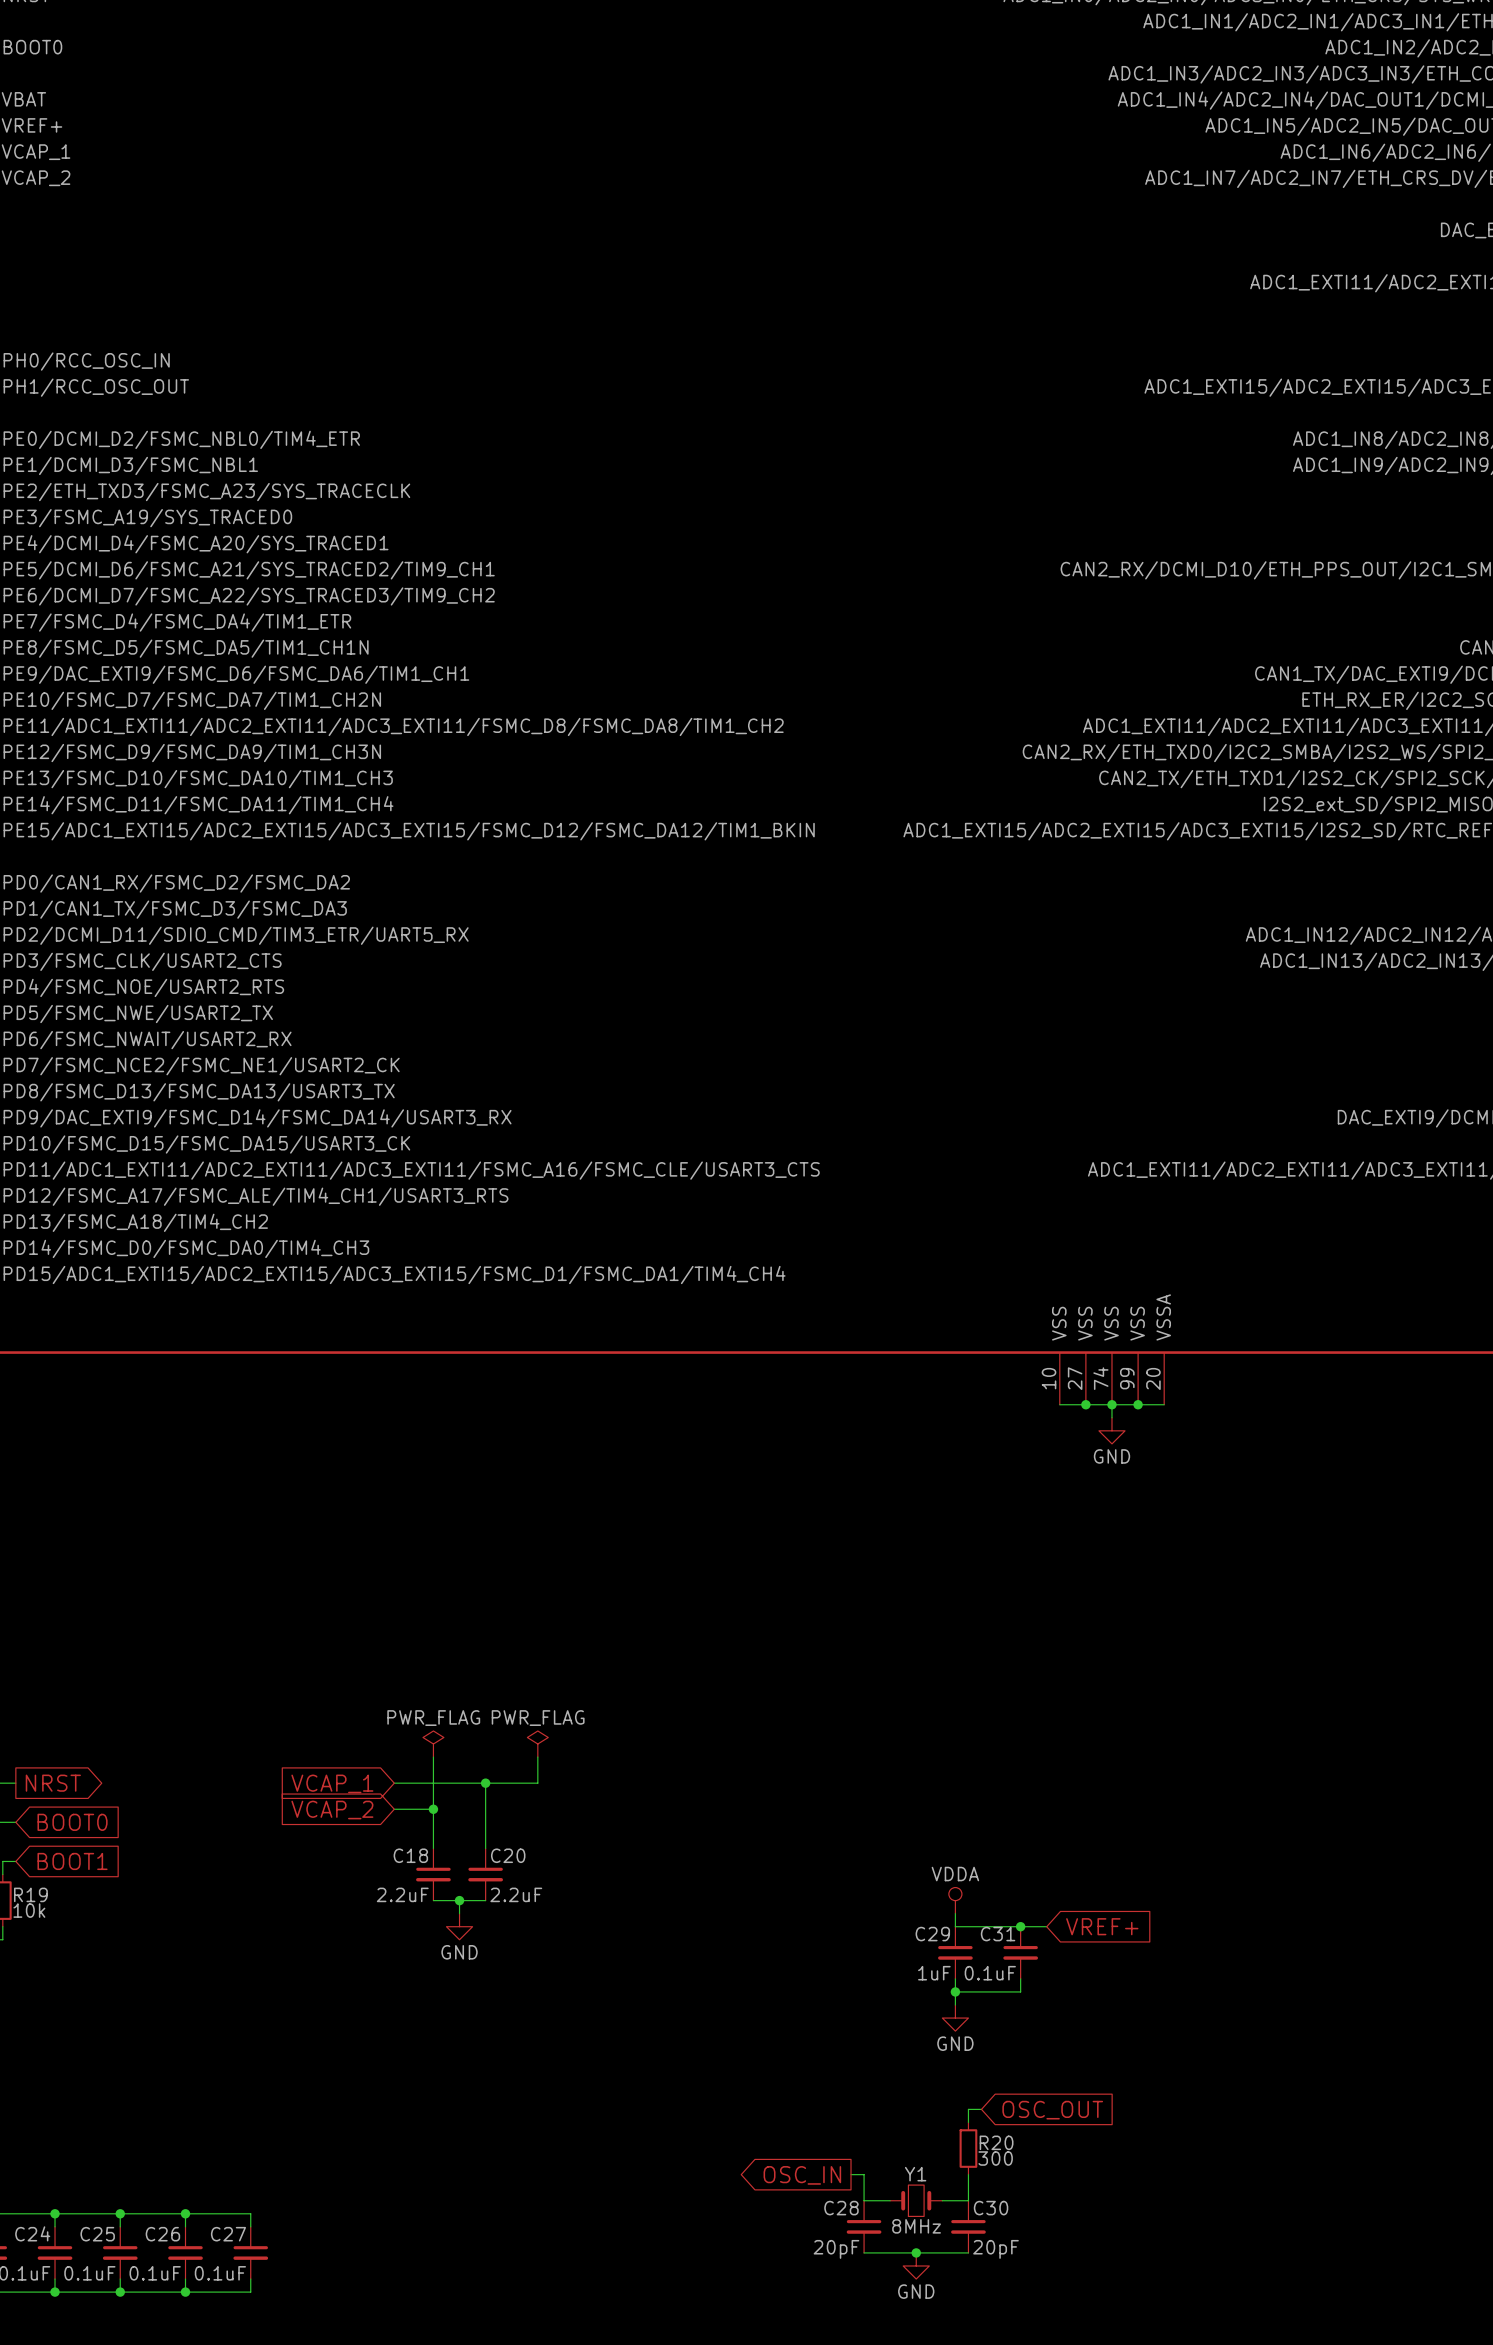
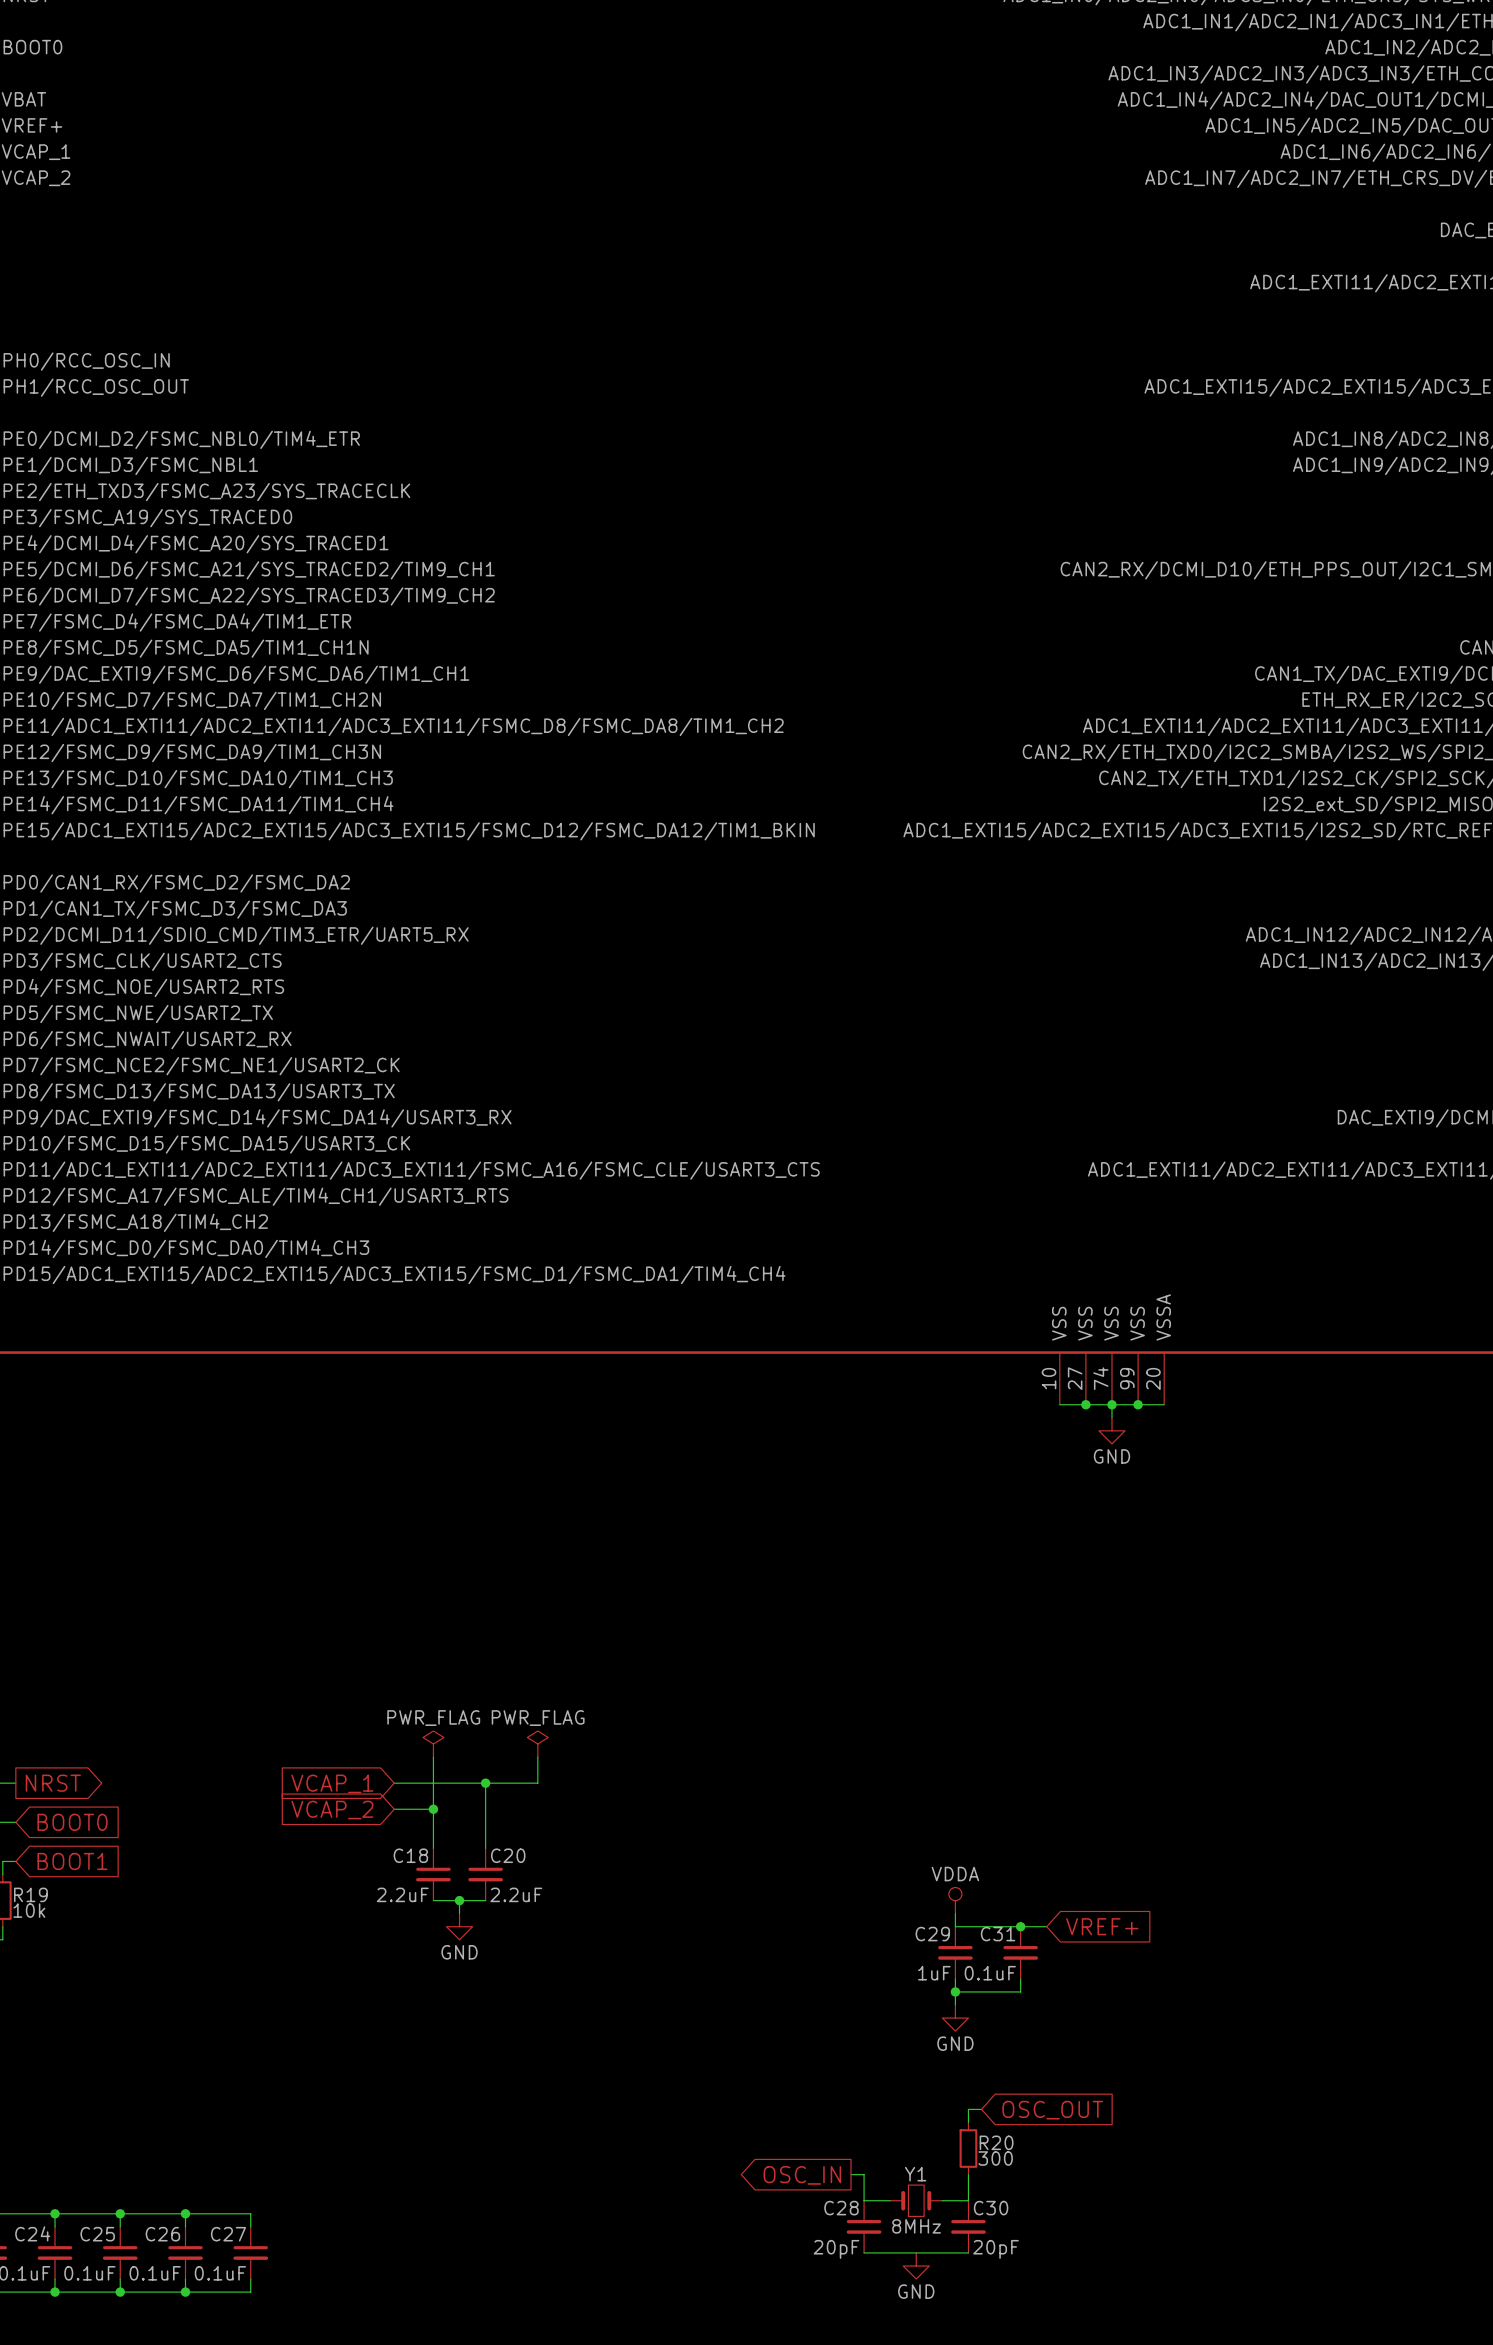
junction: (916, 2252) -> none

